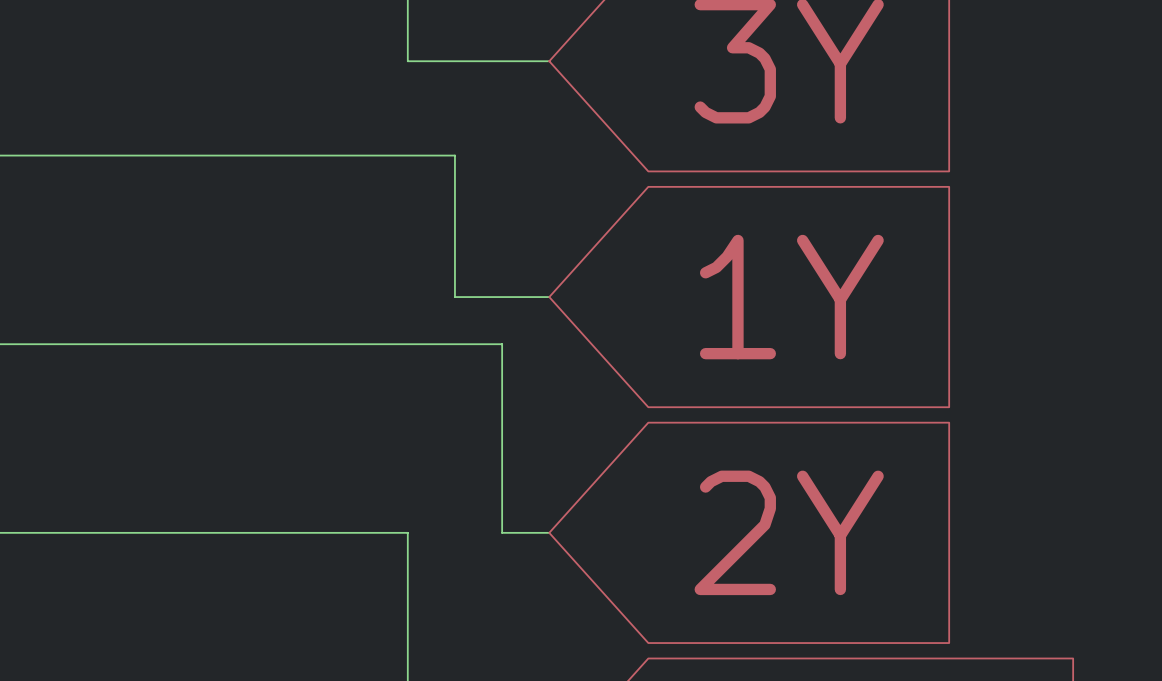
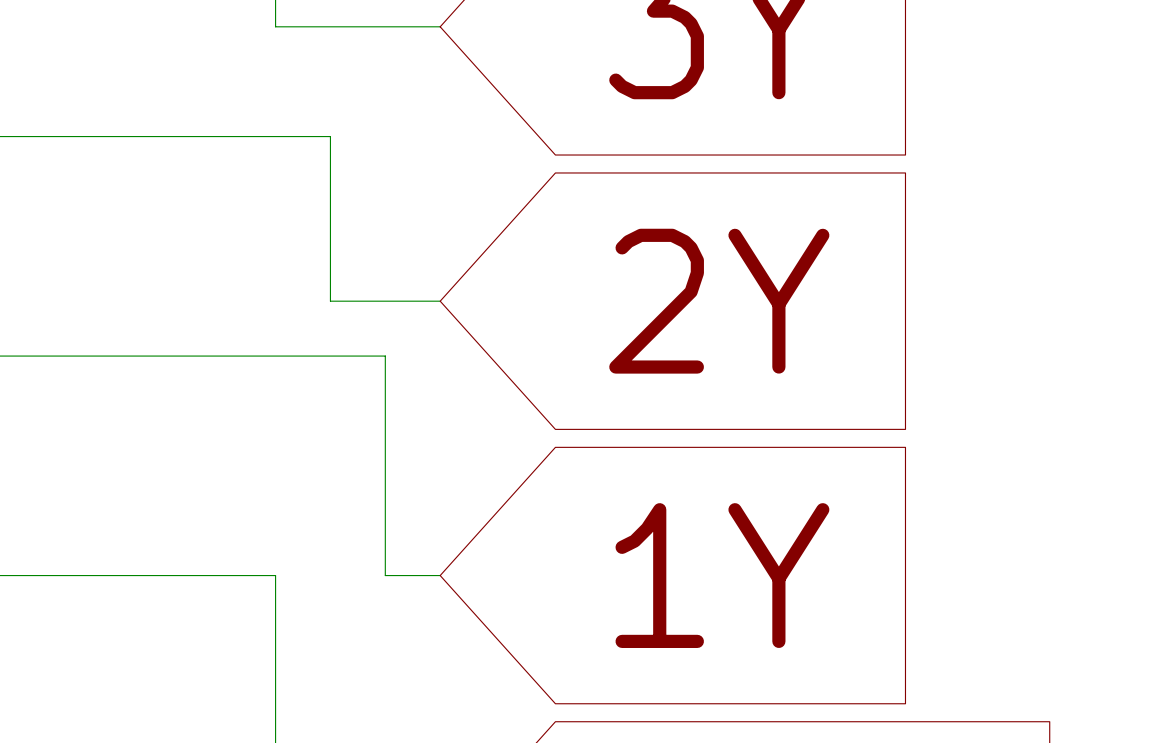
global label: 1Y (791, 297) -> 2Y (719, 301)
global label: 2Y (789, 532) -> 1Y (722, 575)

